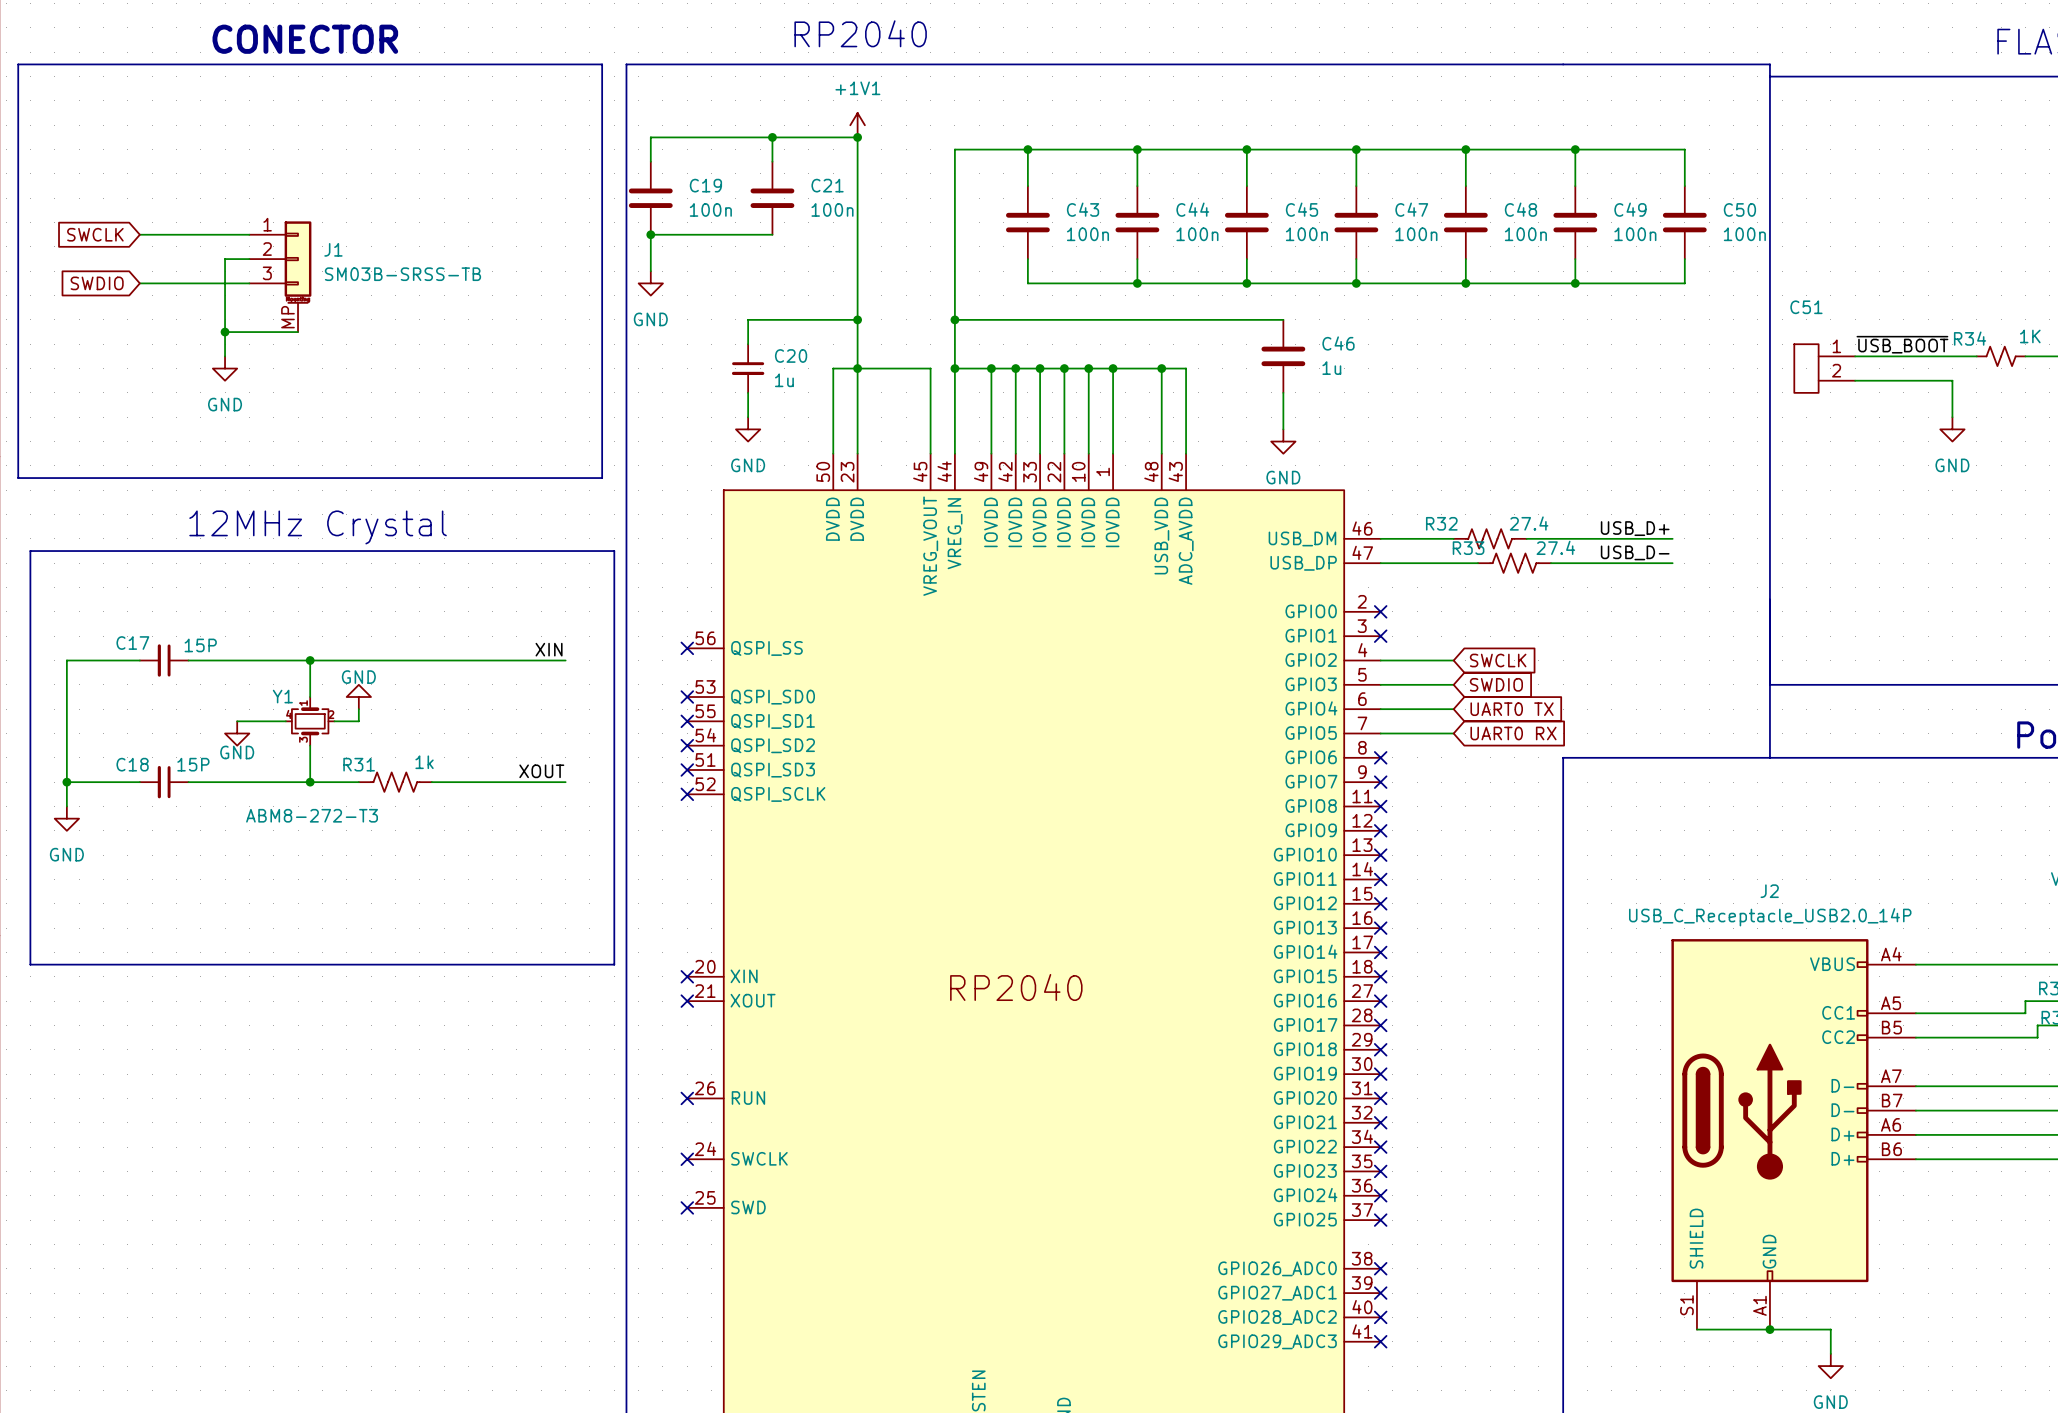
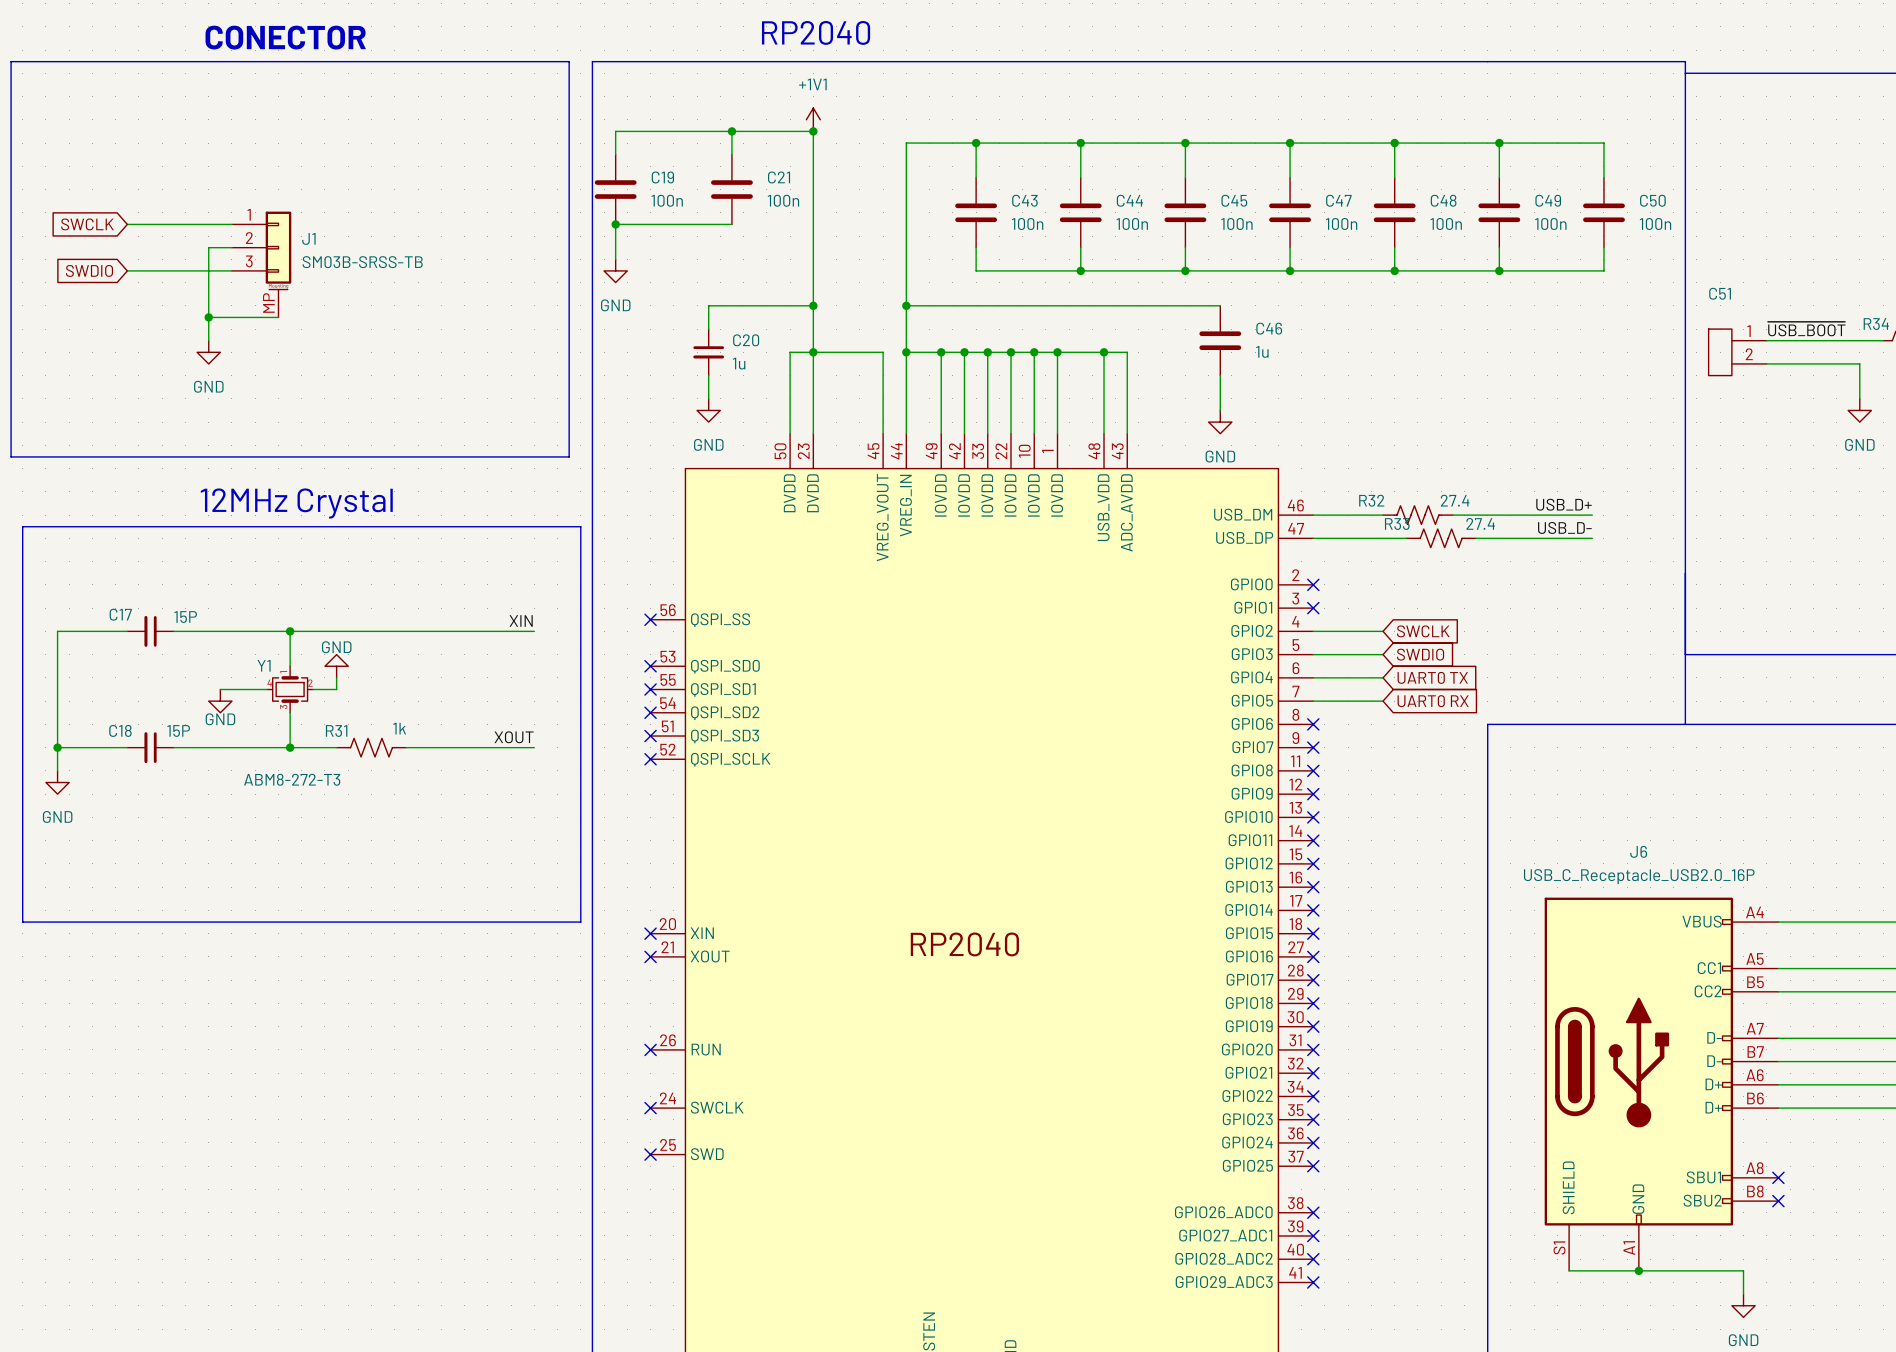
J6: none -> USB_C_Receptacle_USB2.0_16P (1661, 1084)
J2: USB_C_Receptacle_USB2.0_14P (1793, 1134) -> none
no-connect mark: none -> (1778, 1177)
no-connect mark: none -> (1778, 1201)
wire: none -> (1569, 1270) (1615, 1270)
junction position: (1769, 1329) -> (1638, 1270)

